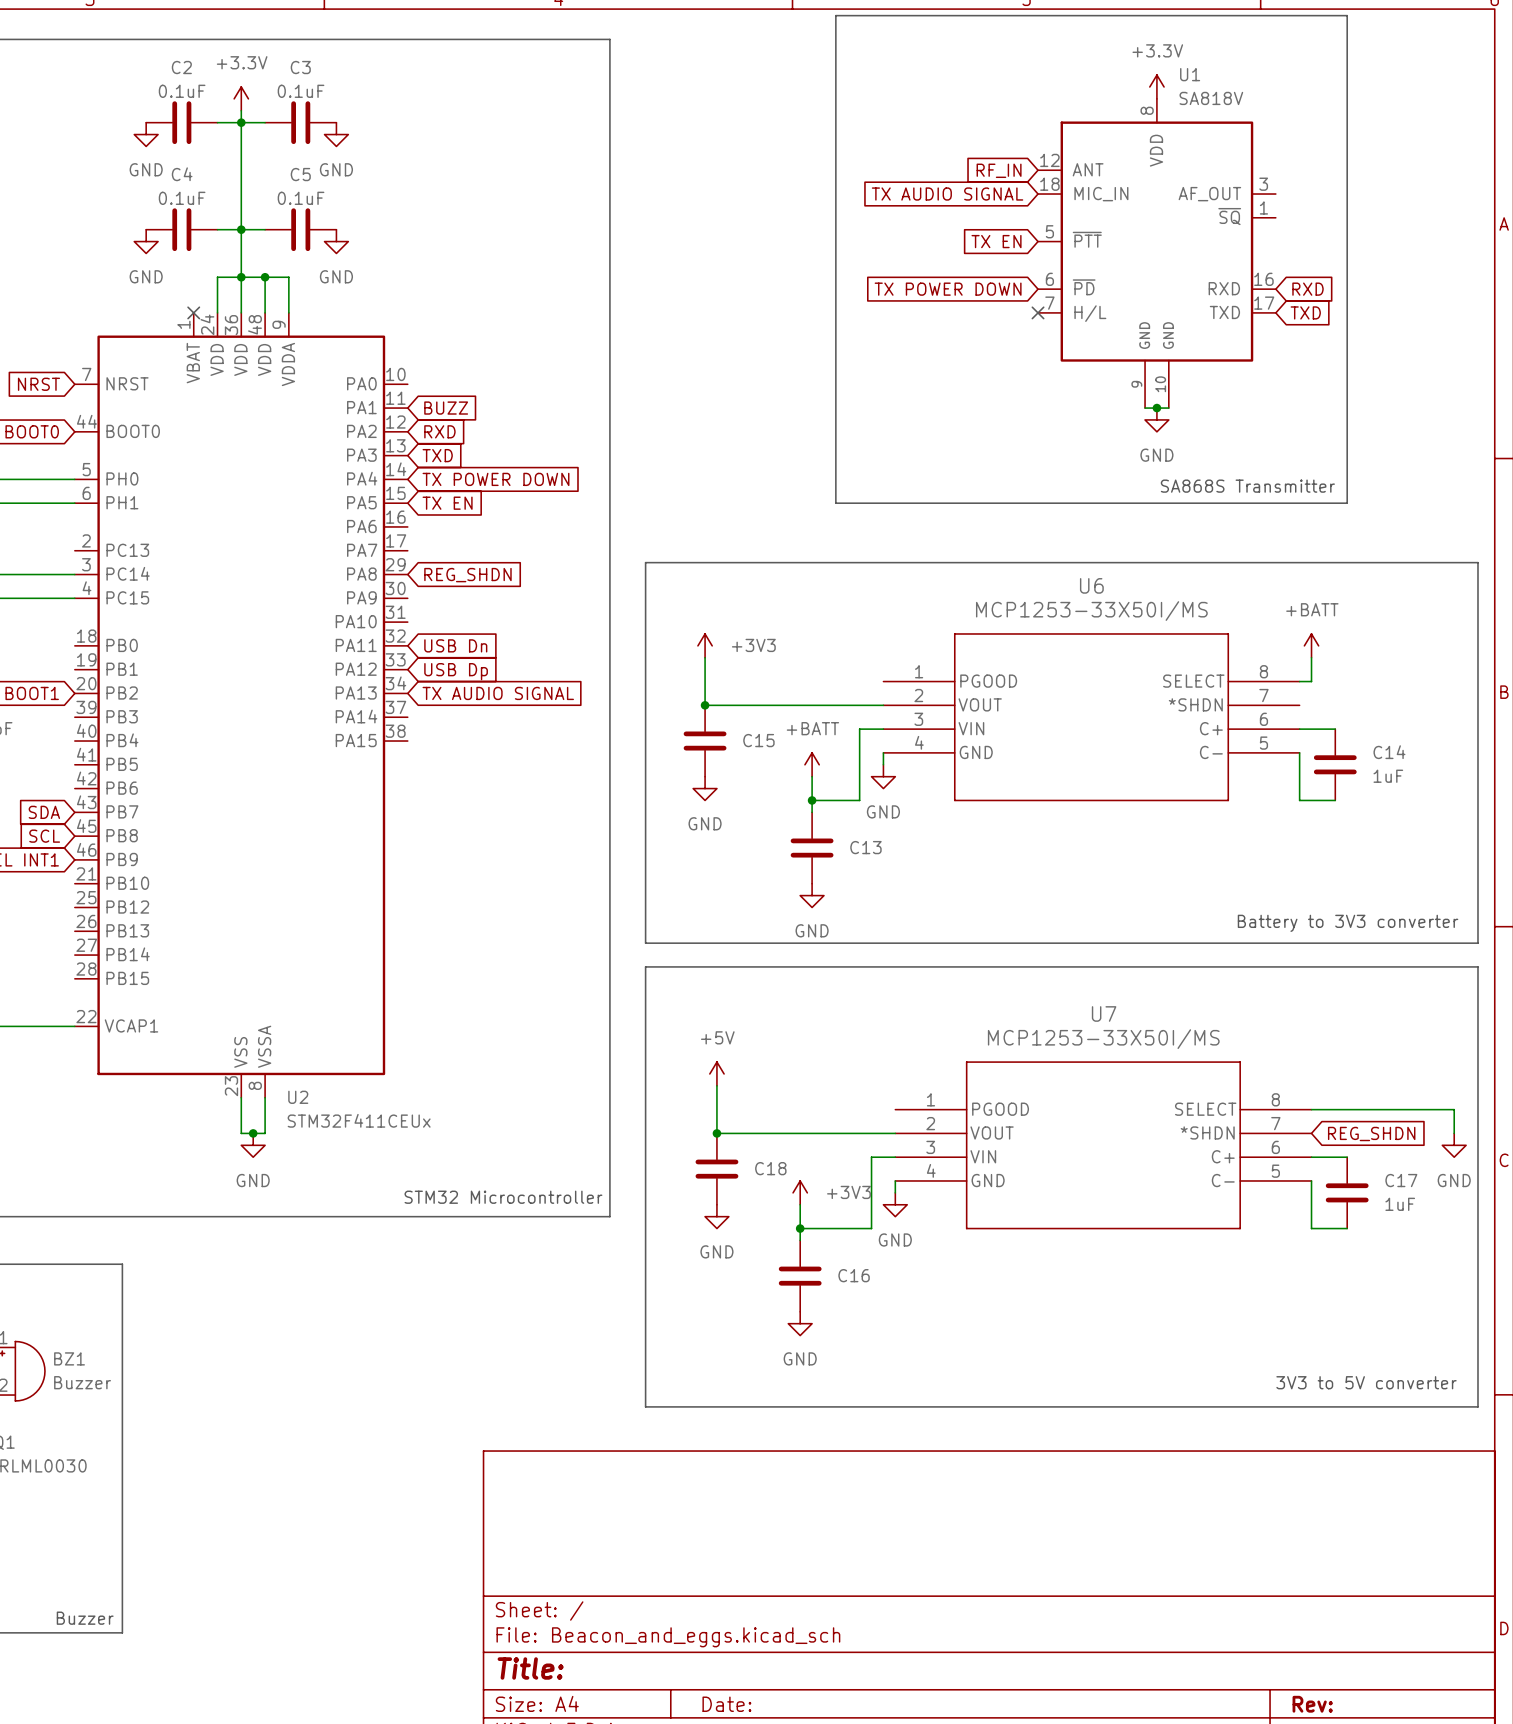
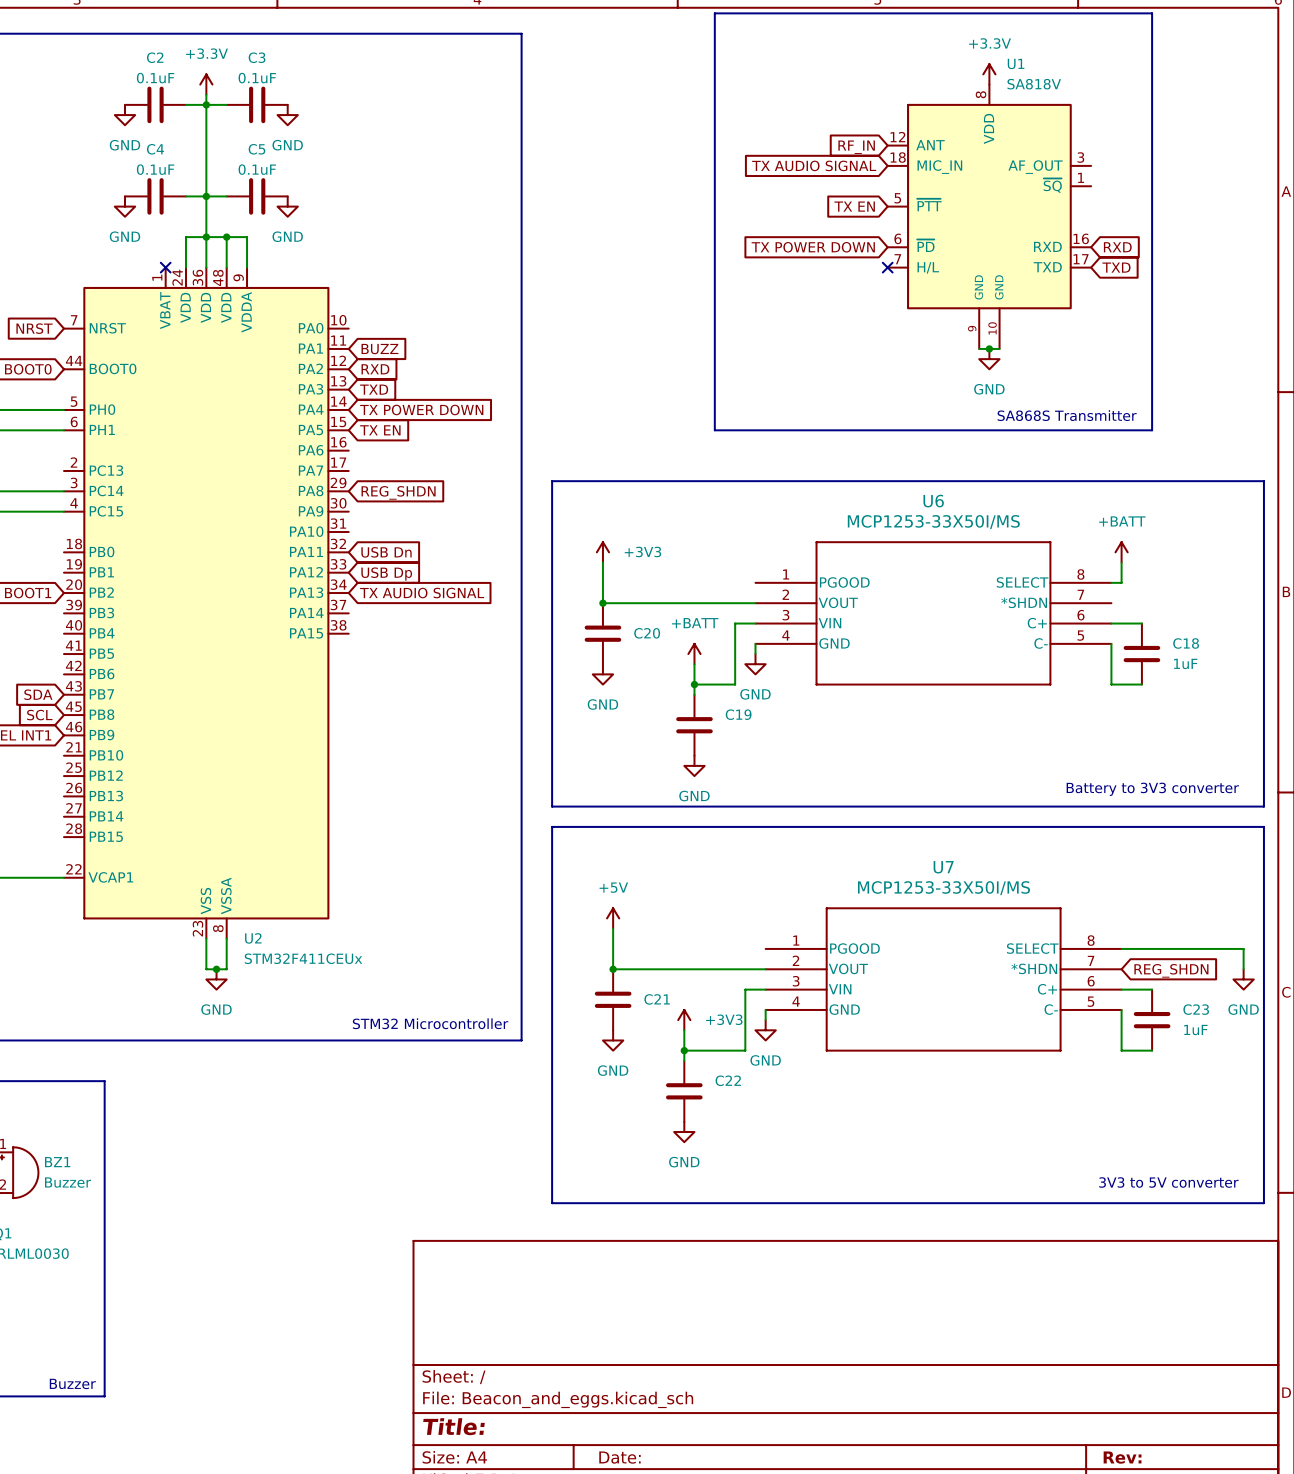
C15 name: C15 (758, 740) -> C20 (647, 633)
C14 name: C14 (1389, 752) -> C18 (1186, 643)
C13 name: C13 (865, 847) -> C19 (738, 714)
C18 name: C18 (770, 1168) -> C21 (657, 999)
C17 name: C17 (1401, 1180) -> C23 (1196, 1009)
C16 name: C16 (854, 1275) -> C22 (728, 1080)

